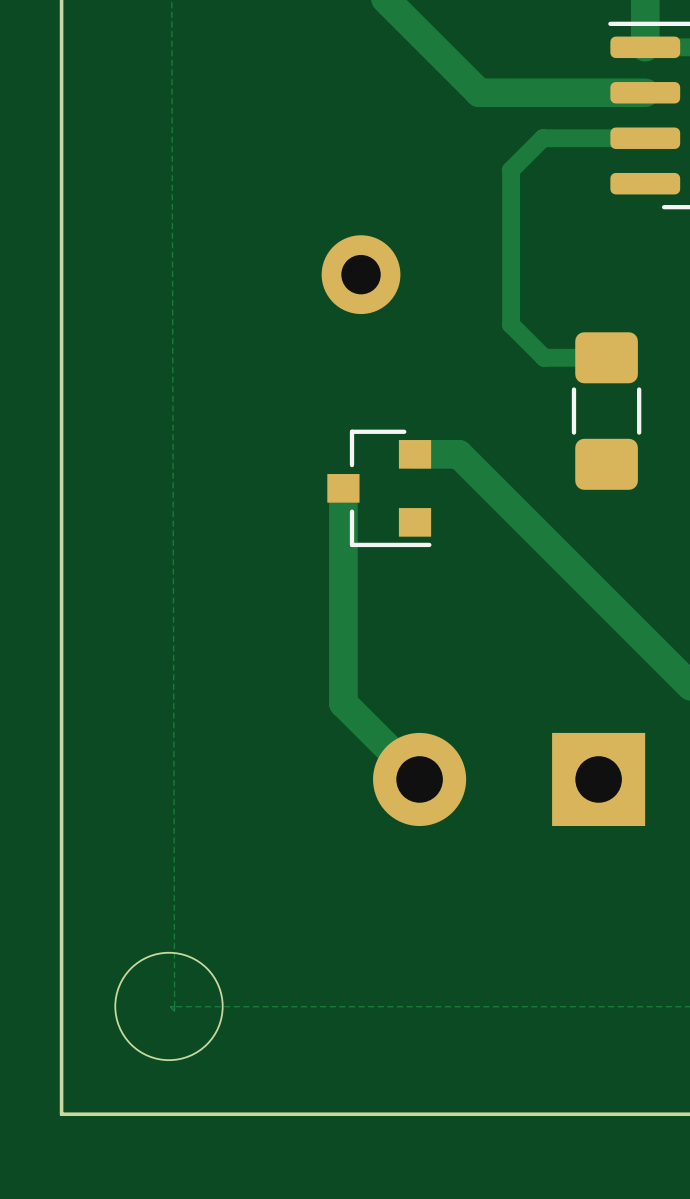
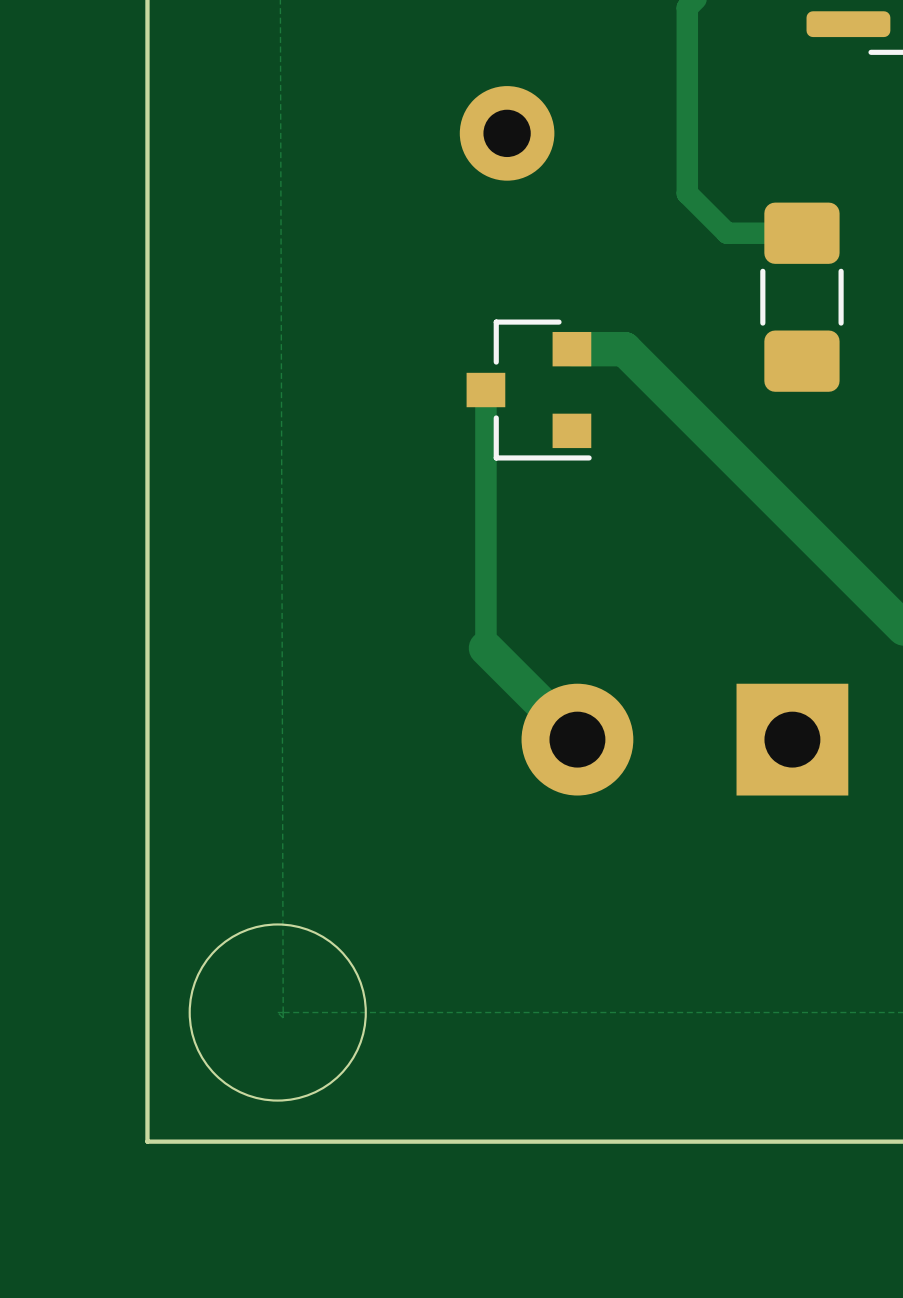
track width: thick (343, 488) (343, 703) -> thin (485, 390) (485, 648)
round board edge size: [114, 951, 224, 1062] -> [188, 923, 367, 1102]

